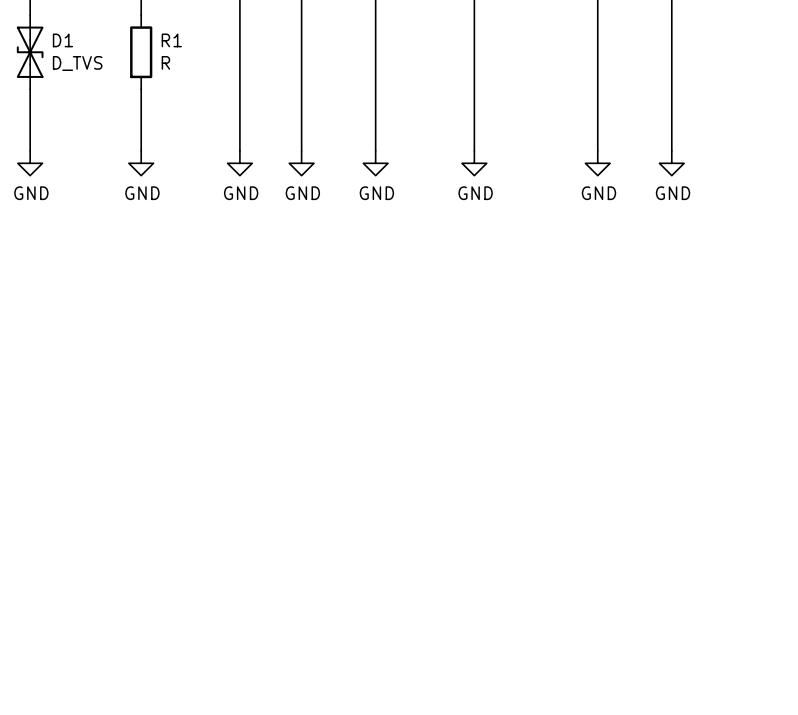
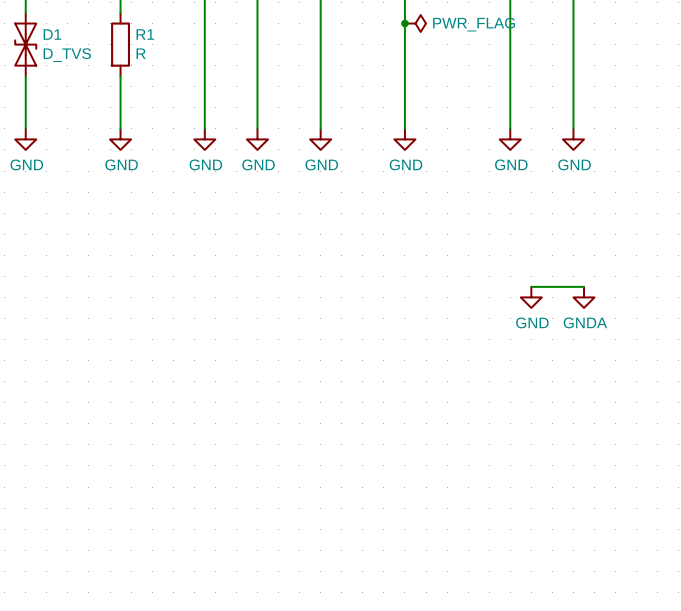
junction: none -> (404, 23)
power symbol: none -> PWR_FLAG (415, 23)
wire: none -> (531, 286) (584, 286)
power symbol: none -> GND (531, 297)
power symbol: none -> GNDA (584, 297)

